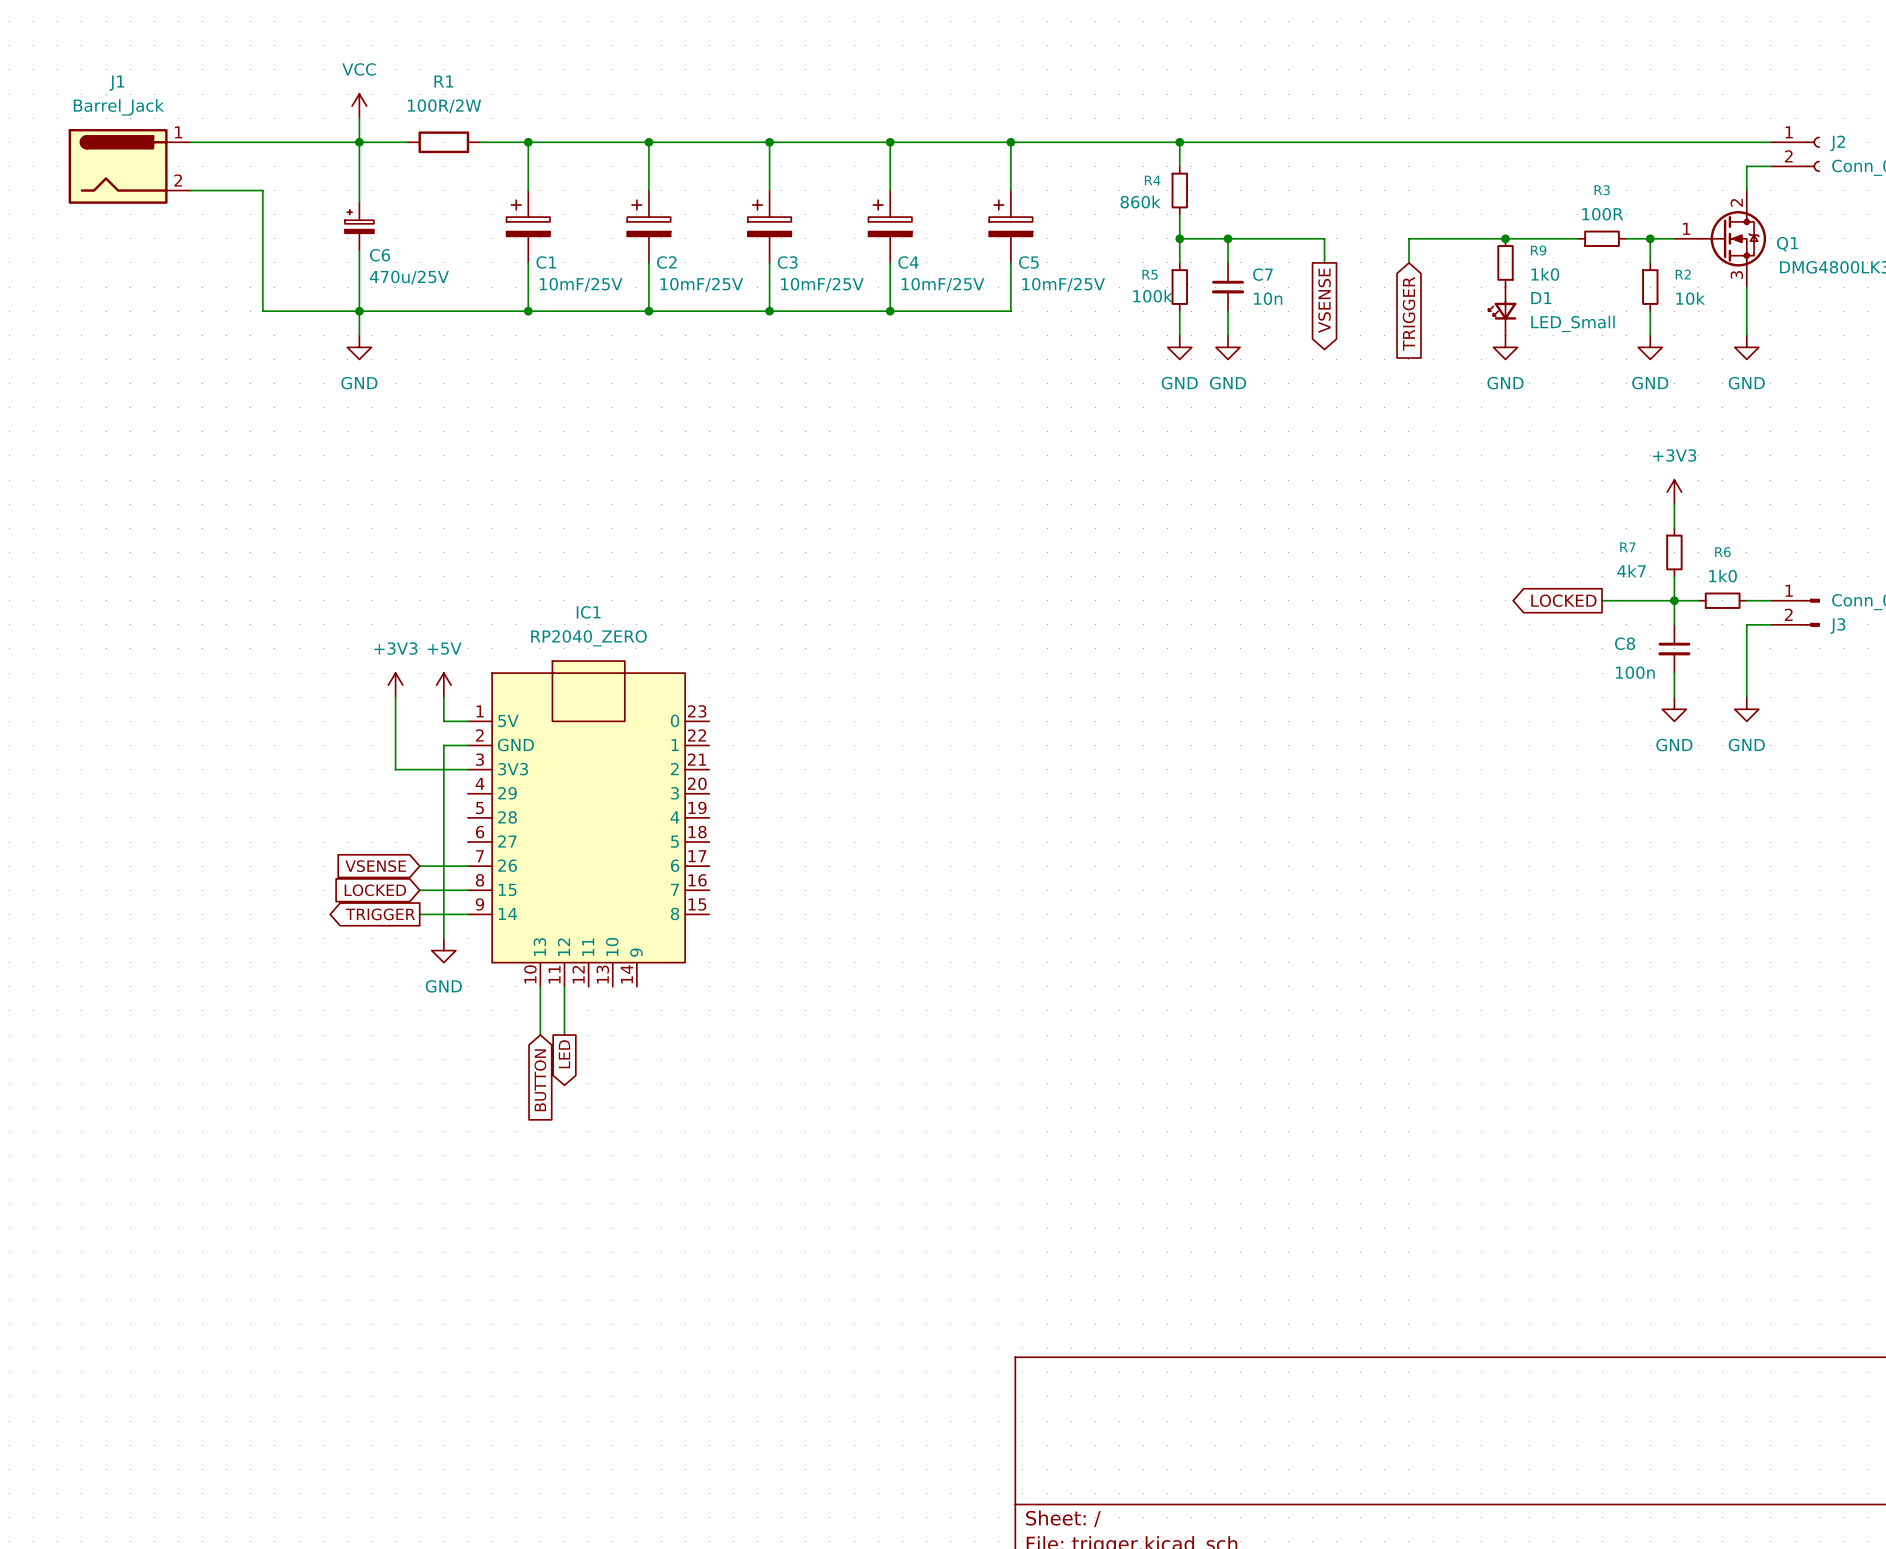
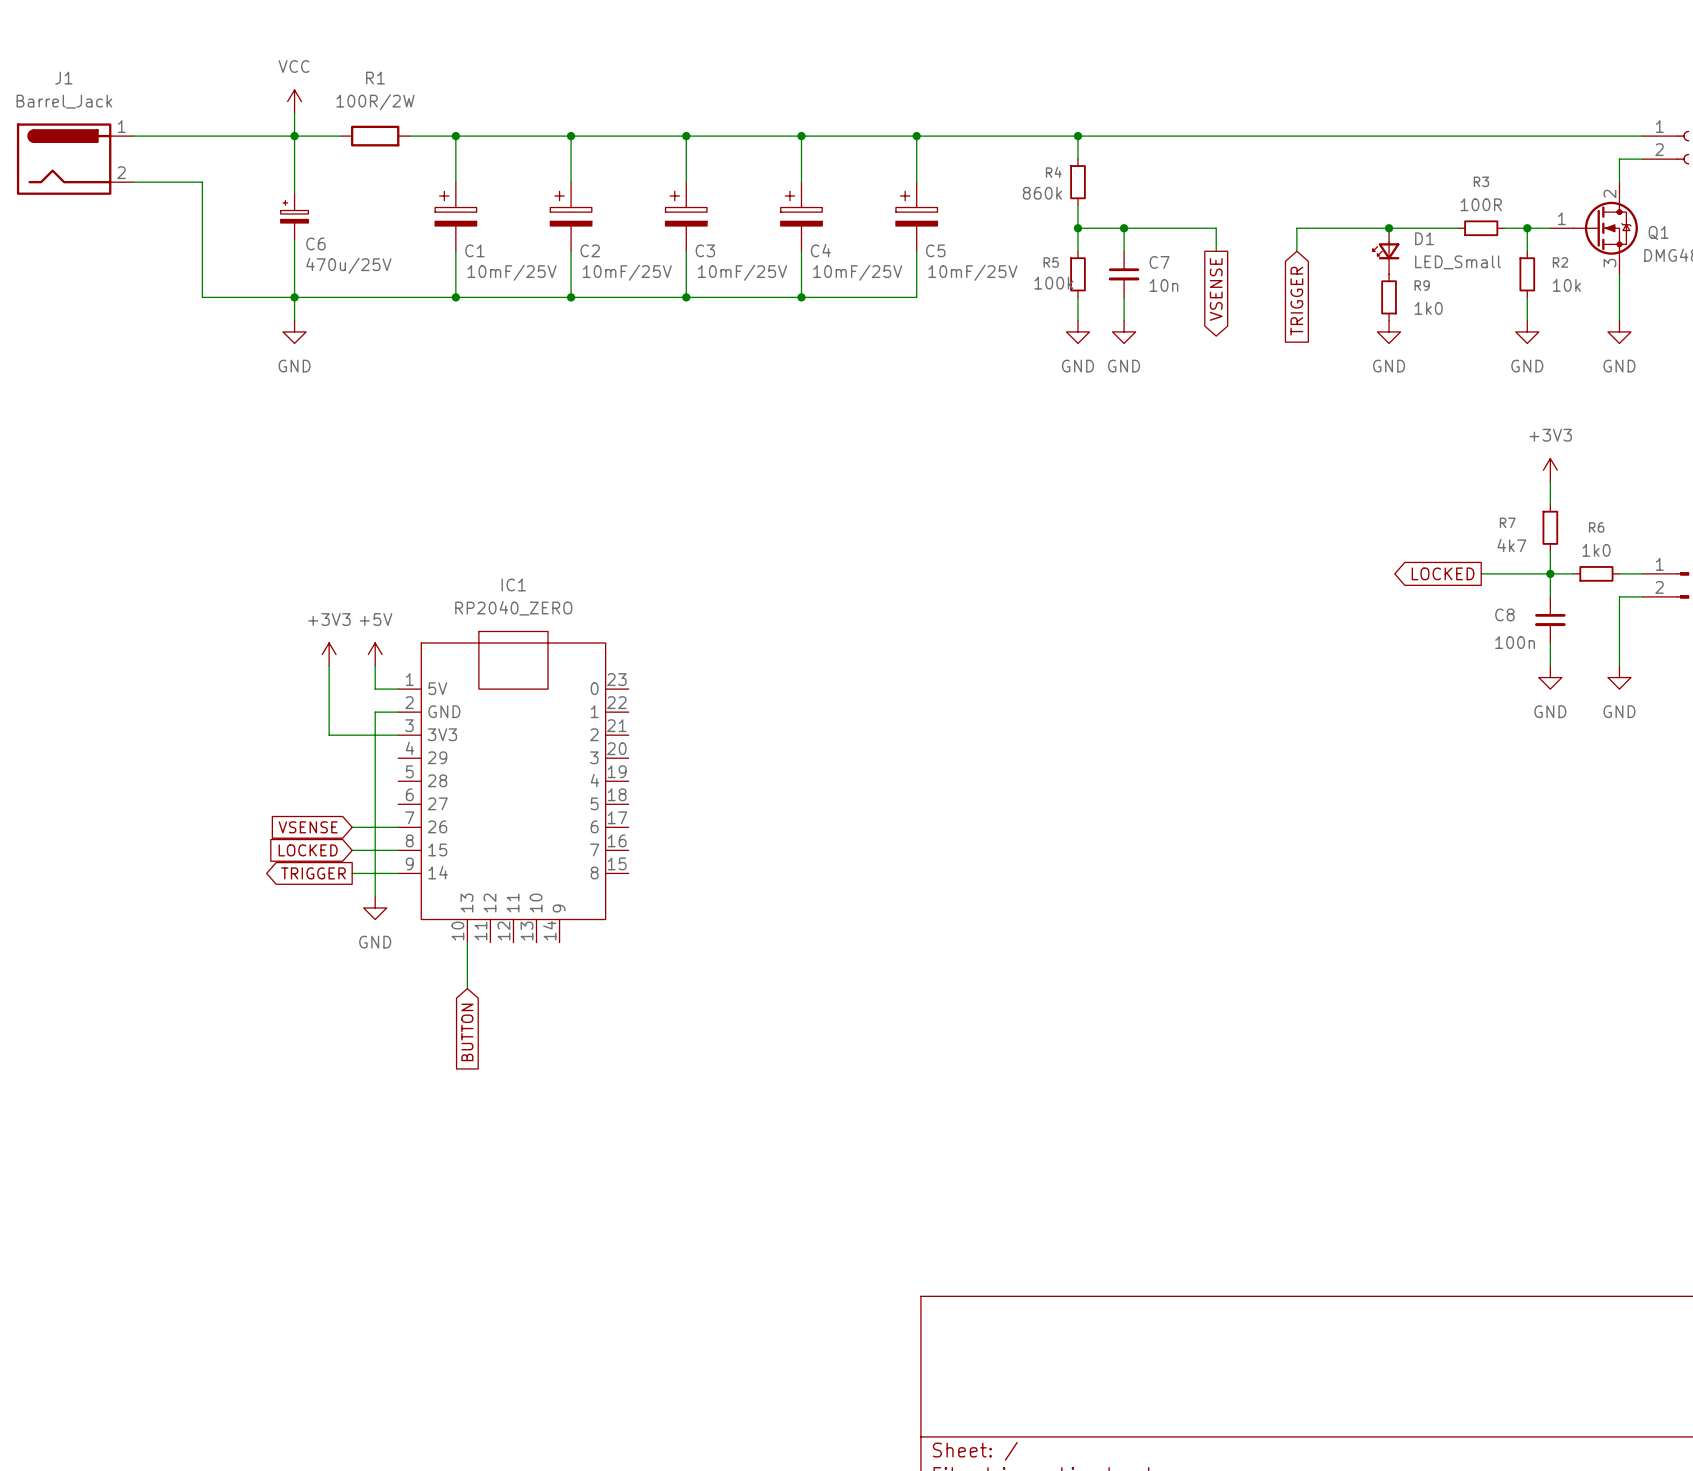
R9 position: (1505, 262) -> (1389, 297)
D1 position: (1502, 311) -> (1386, 251)
wire: (564, 986) (564, 1035) -> none
global label: LED (564, 1054) -> none

